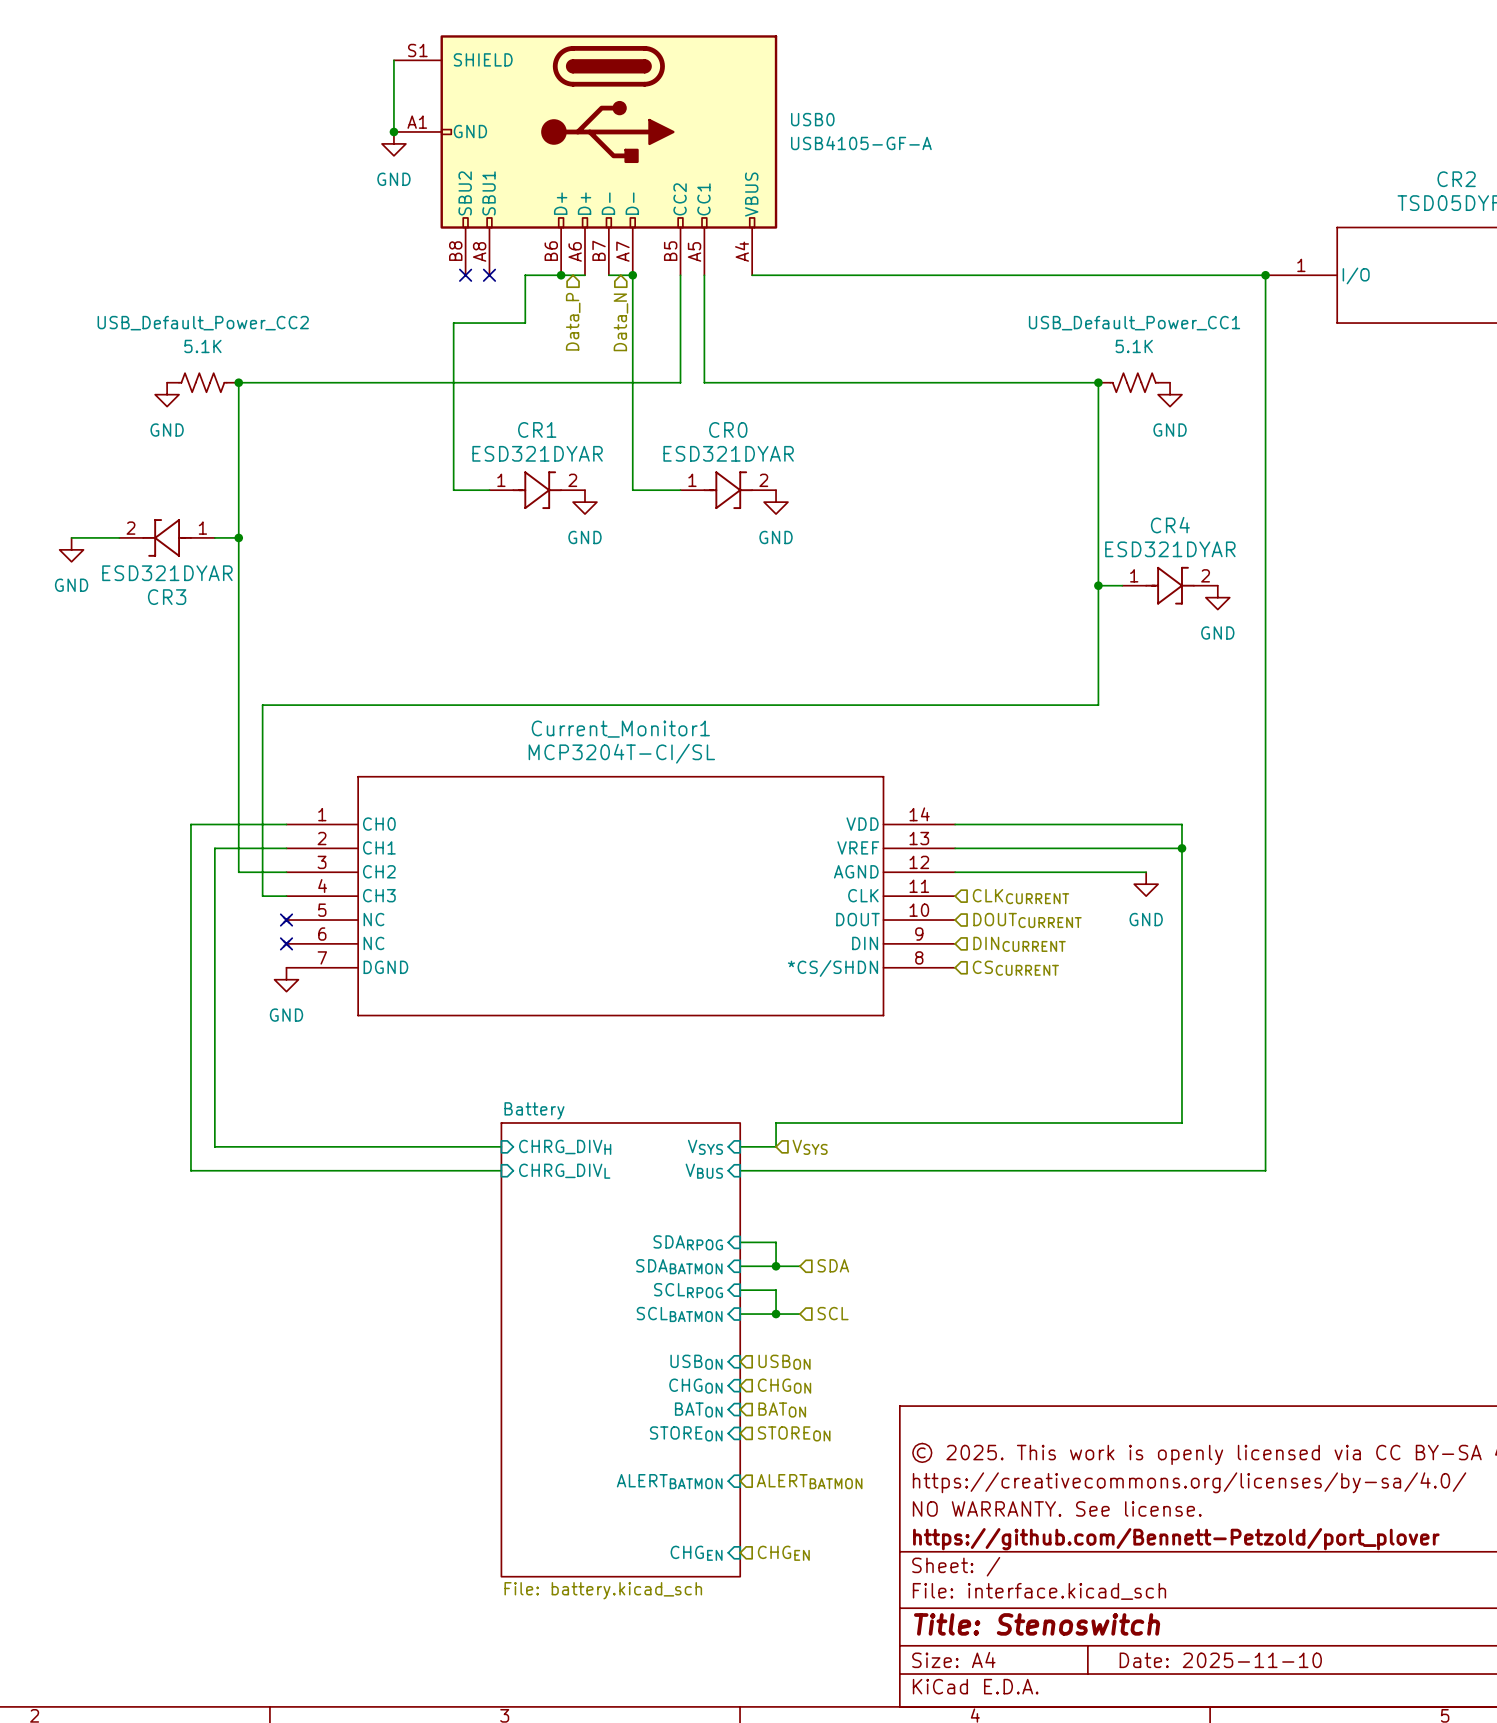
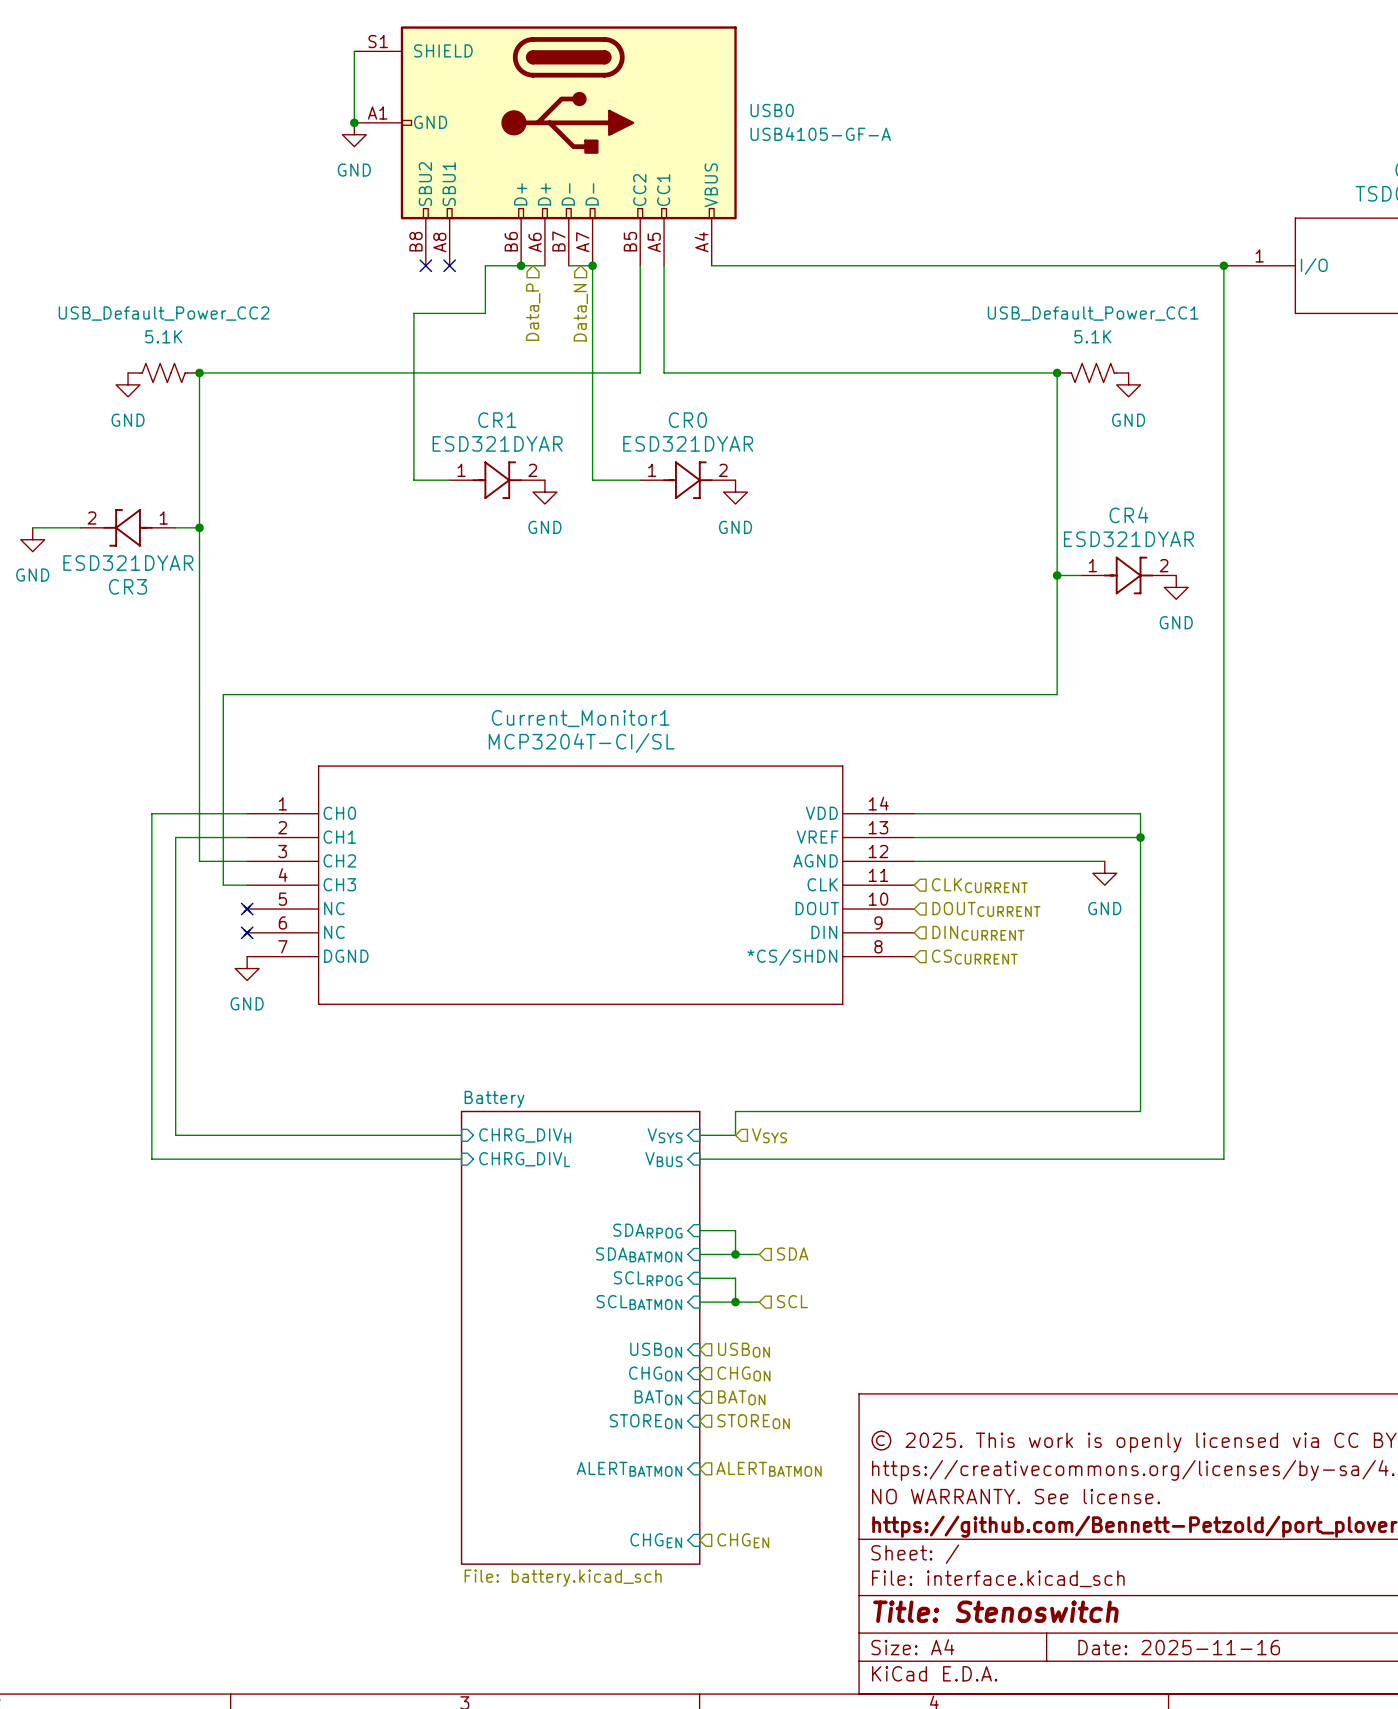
title block: Date: 2025-11-10 (1220, 1660) -> Date: 2025-11-16 (1179, 1647)

